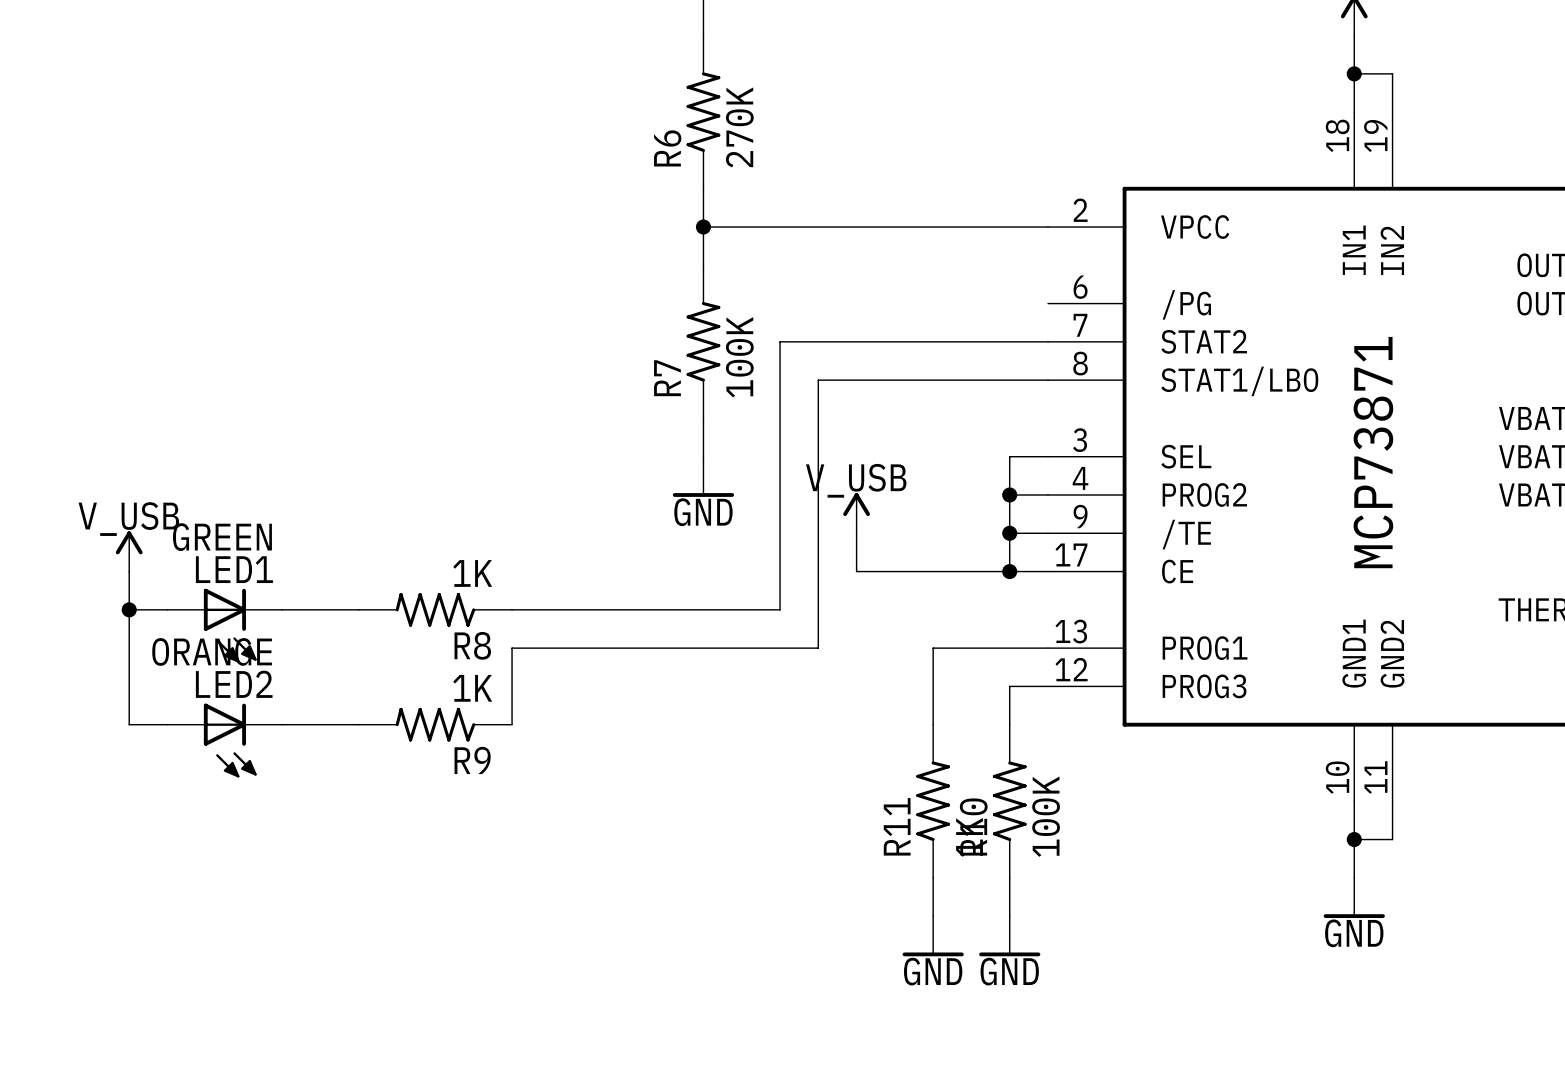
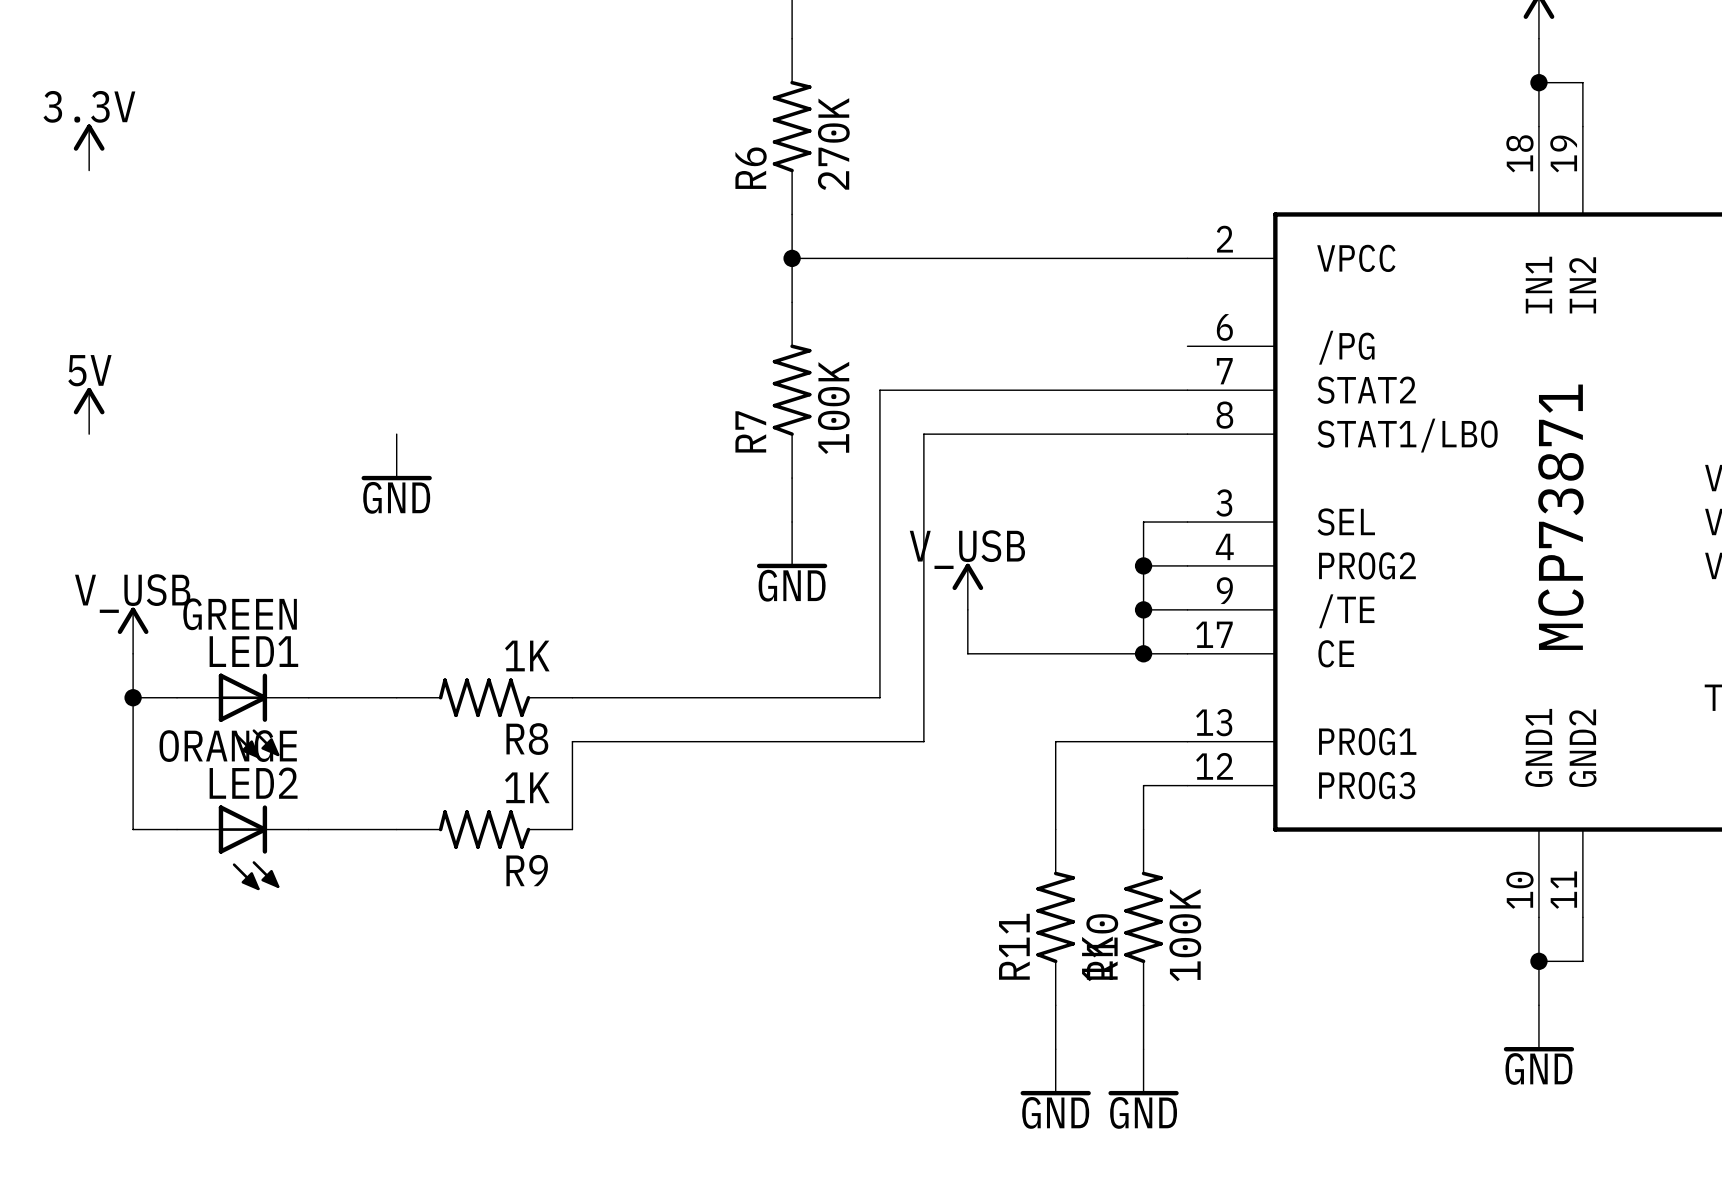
power symbol: none -> 3.3V (89, 147)
power symbol: none -> 5V (89, 411)
power symbol: none -> GND (396, 457)

